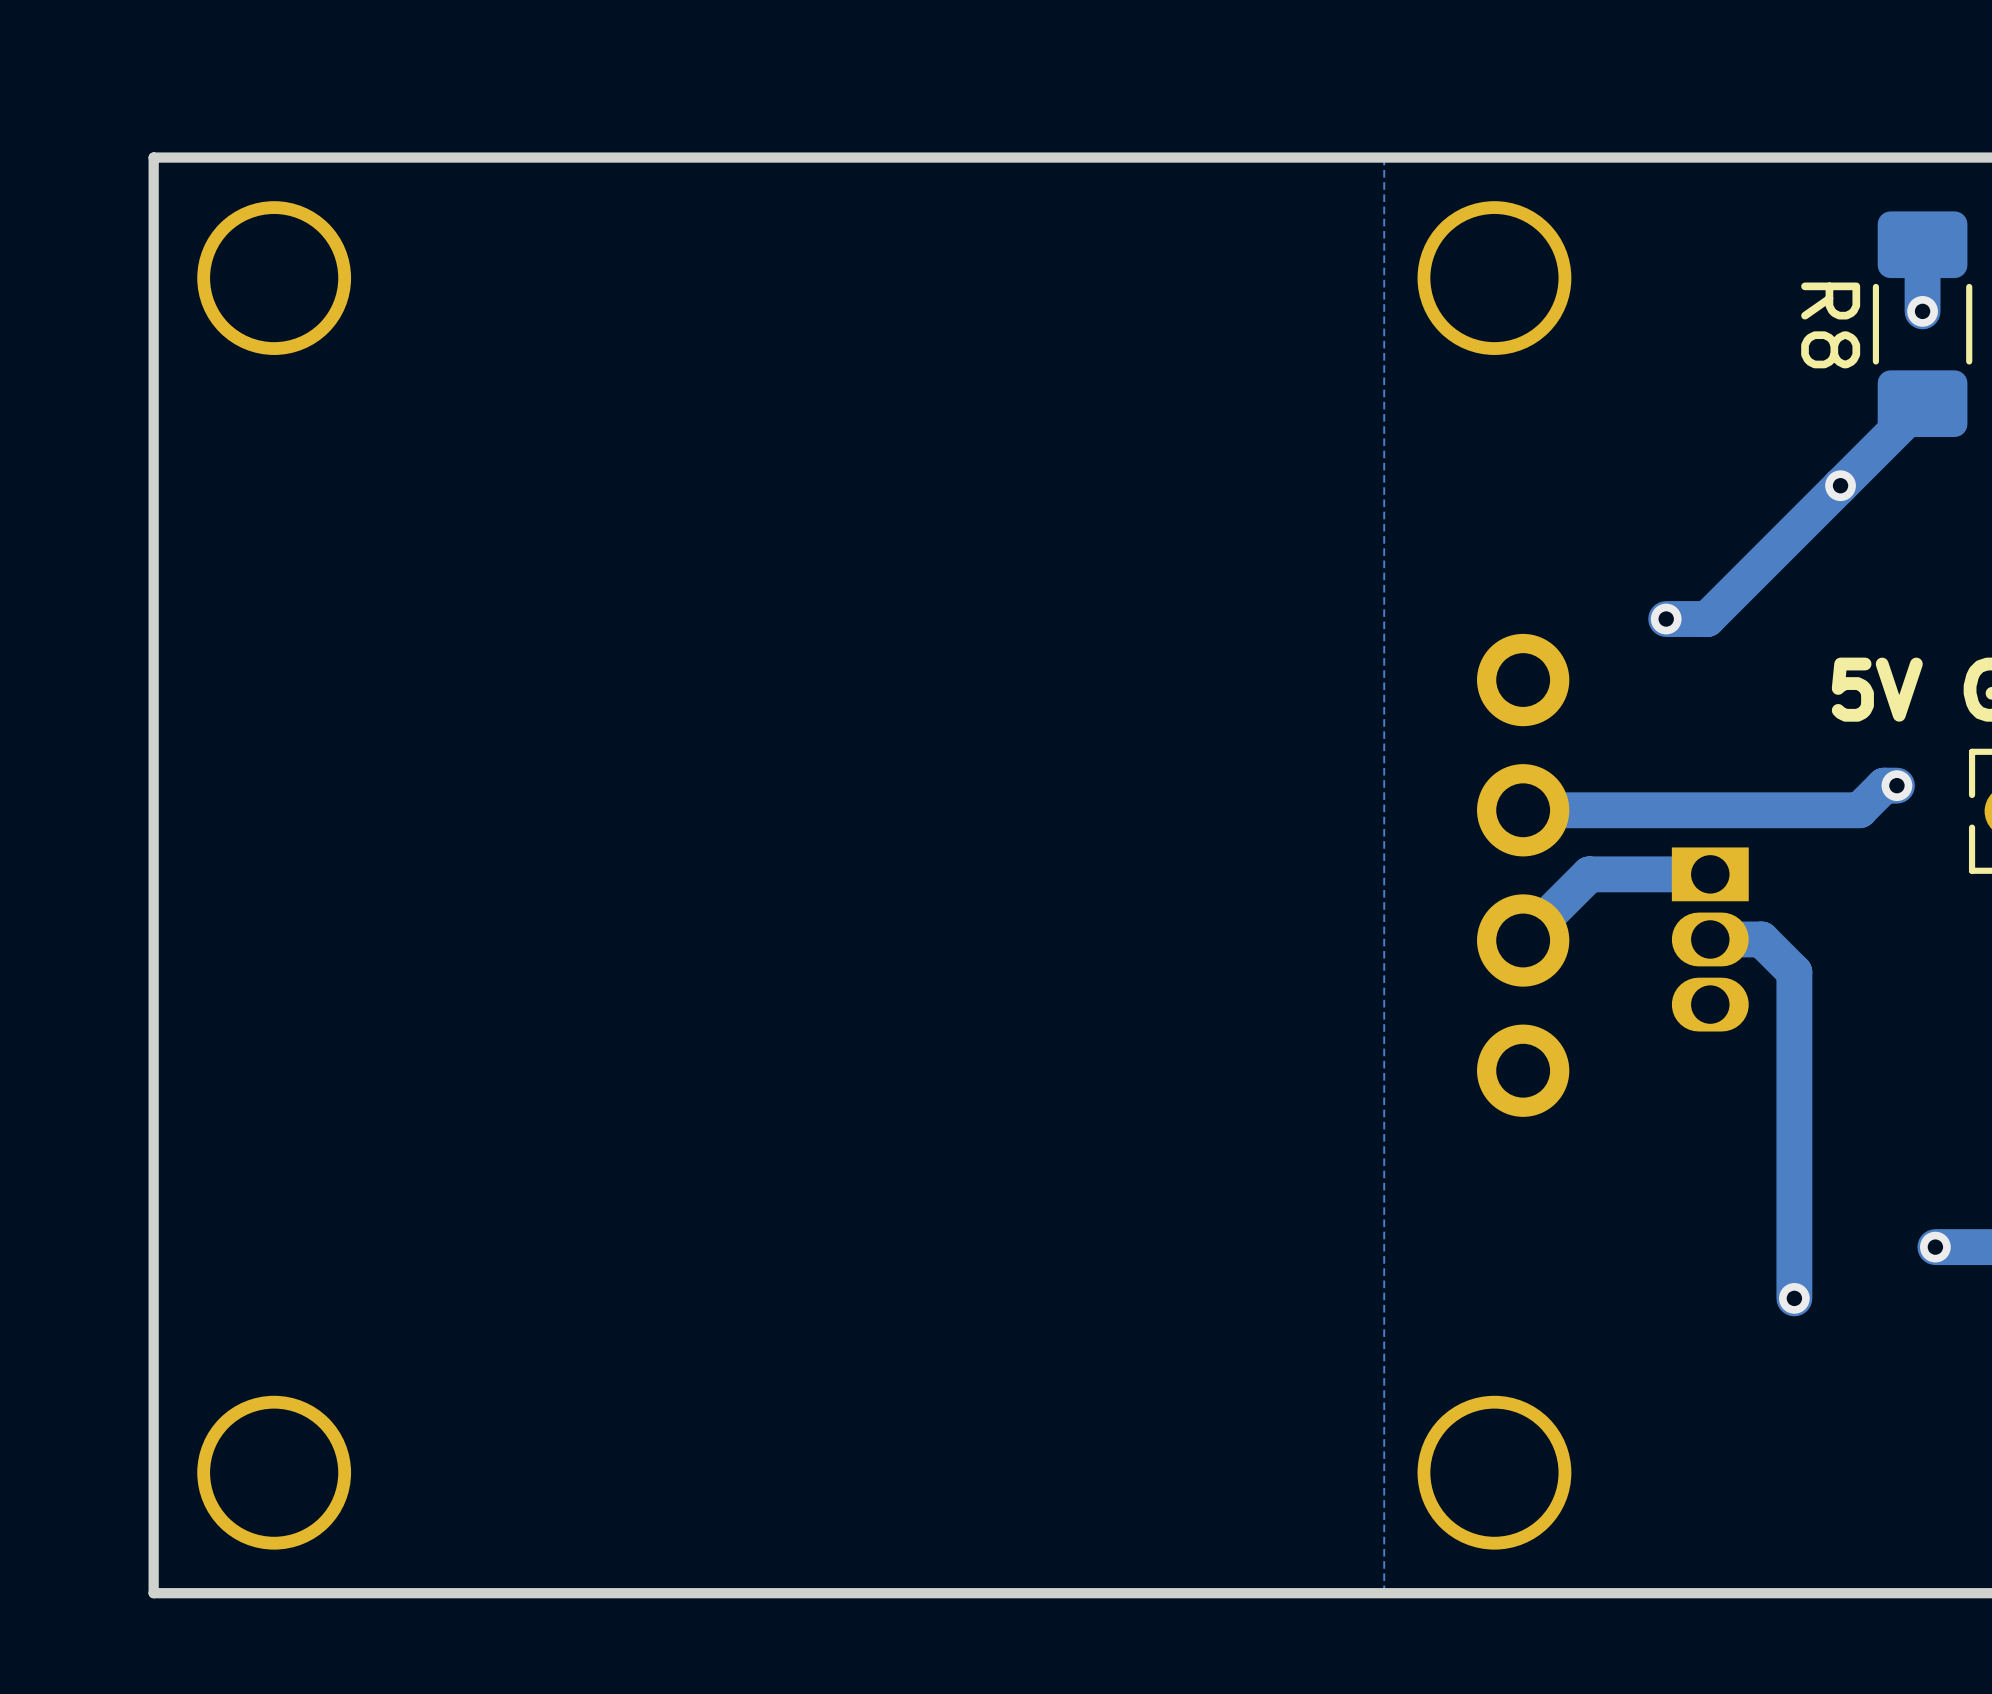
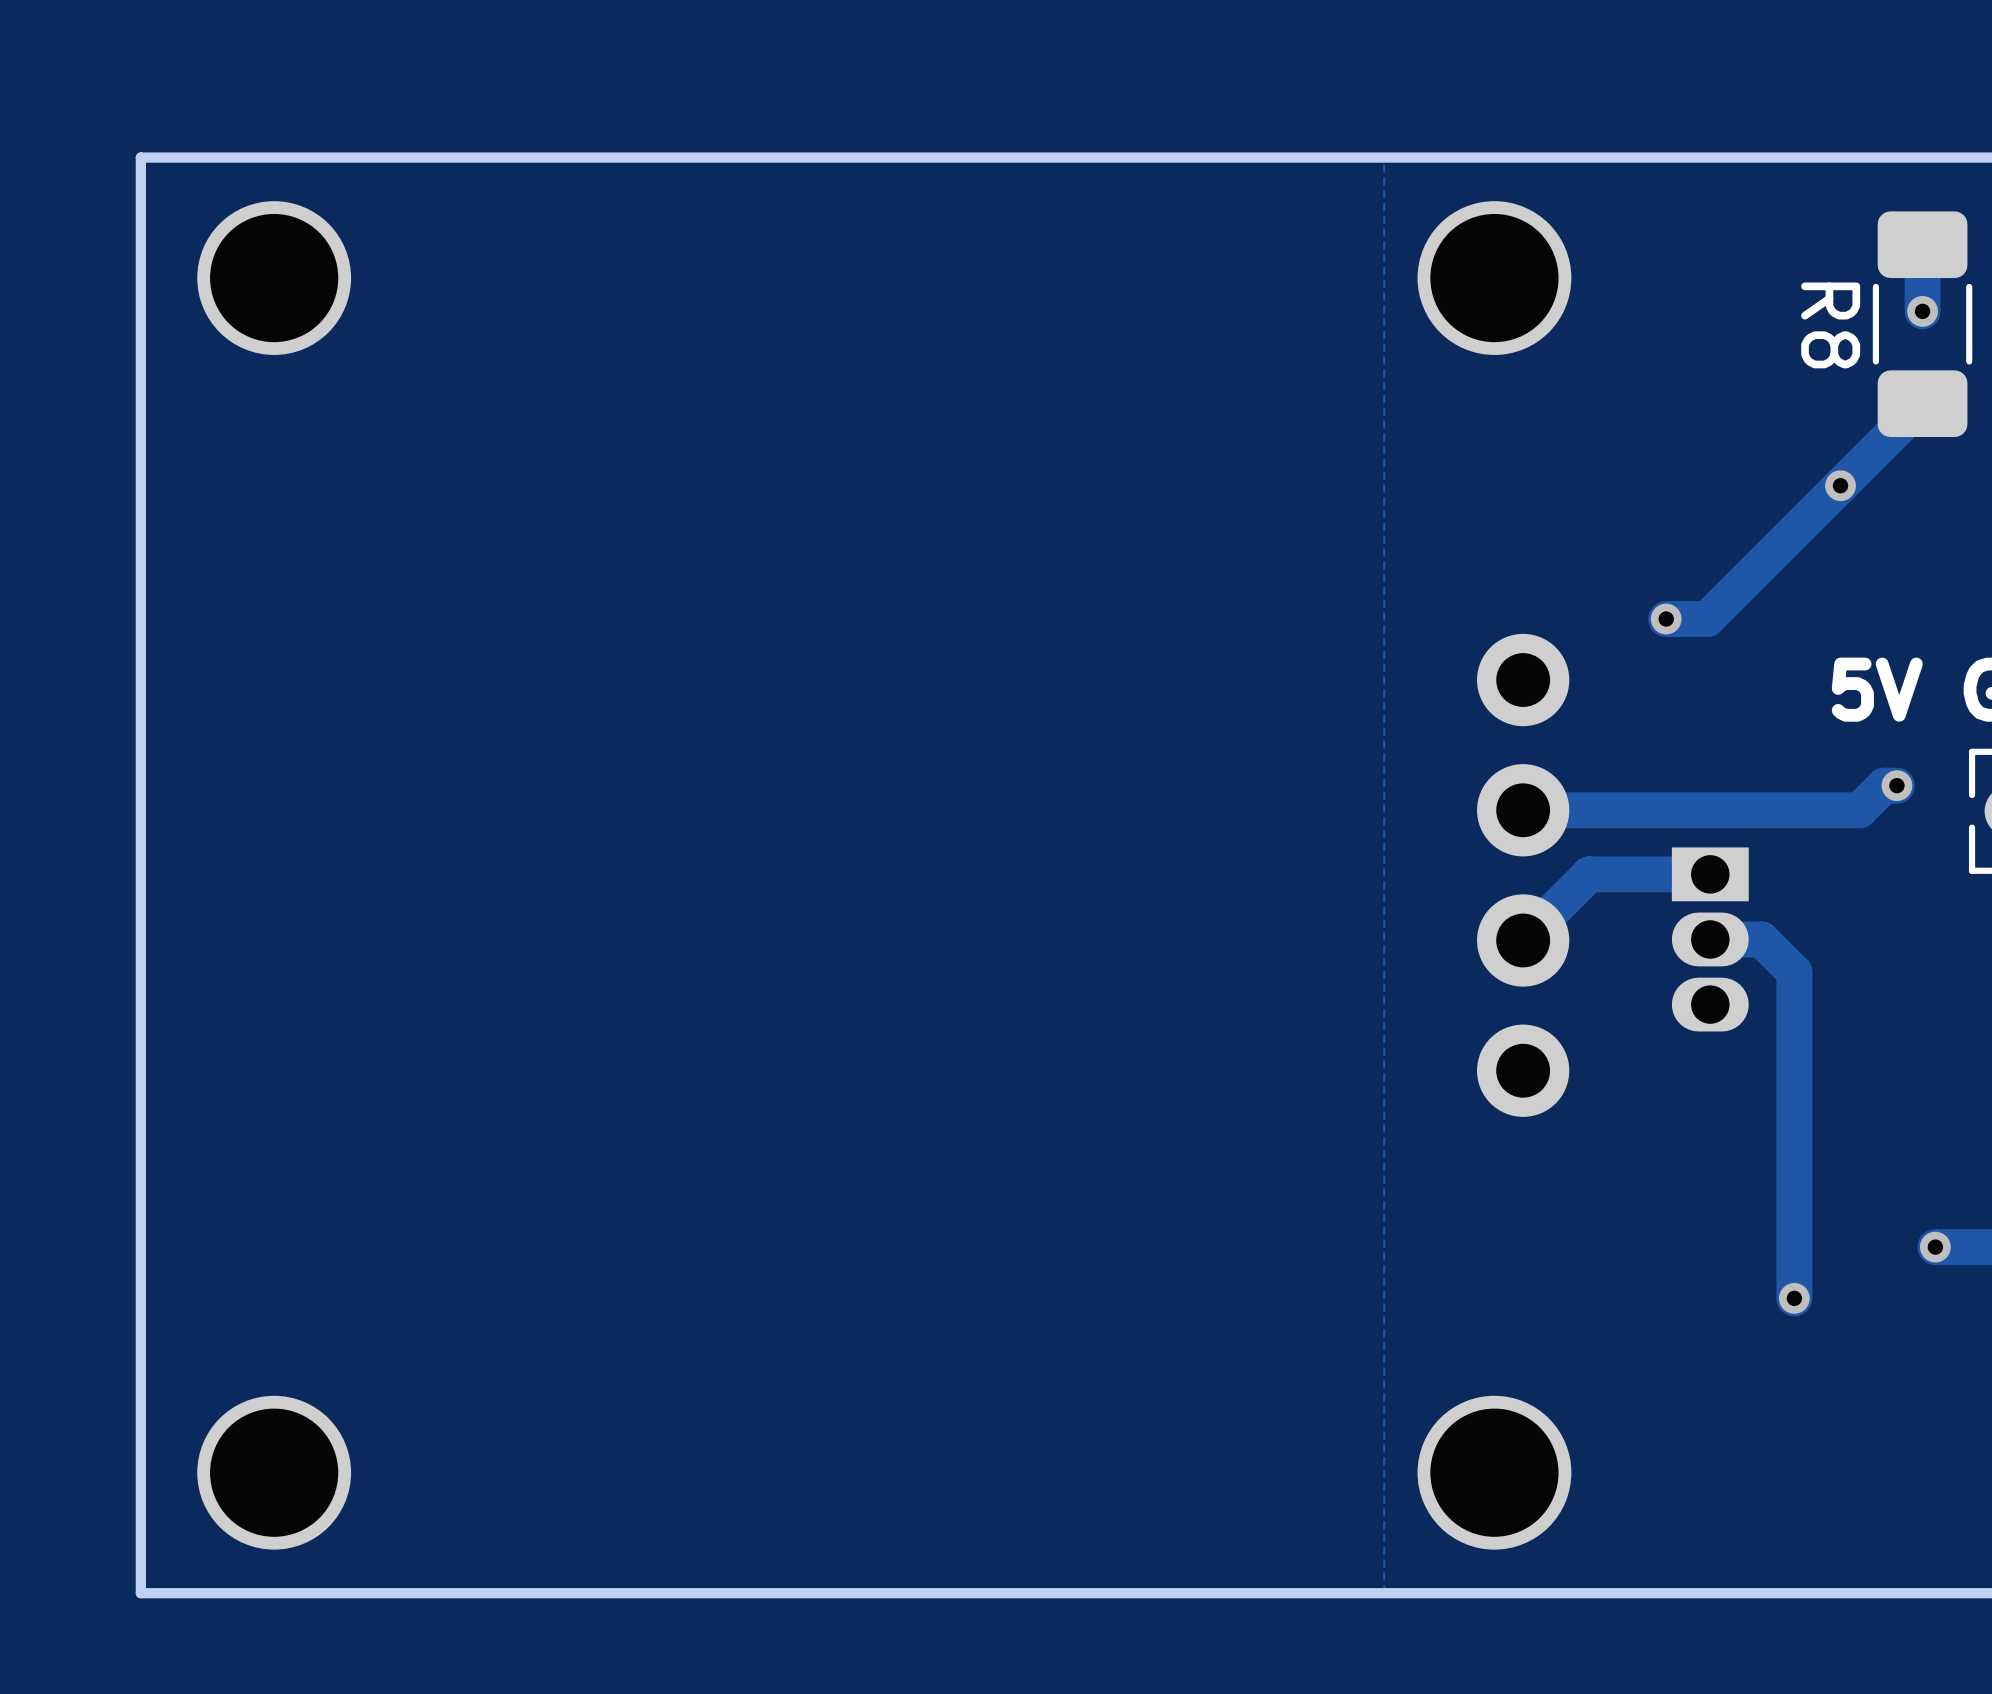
board edge: (153, 157) (153, 1593) -> (153, 157) (140, 157) (140, 1593) (153, 1593)

